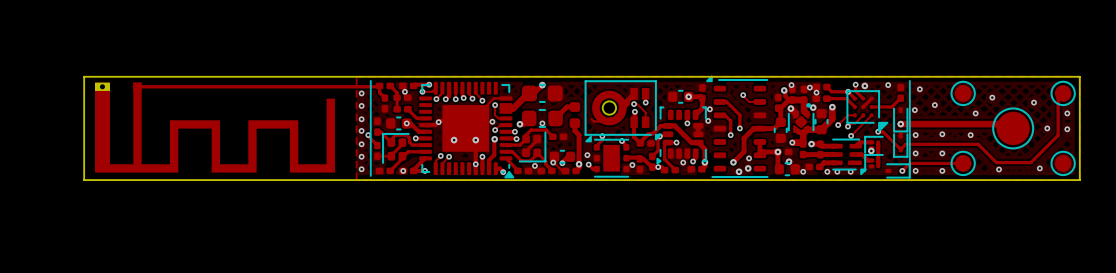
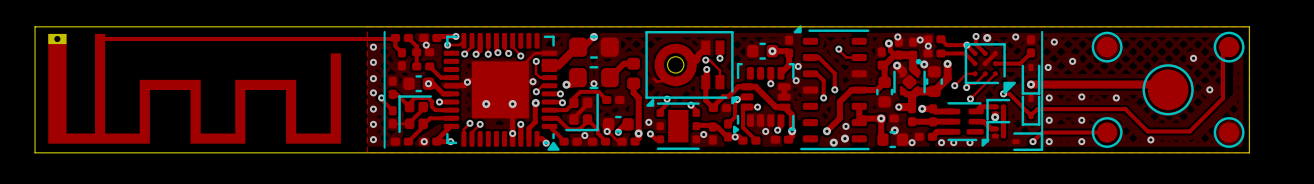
via: (992, 97) -> none
via: (975, 113) -> none
via: (1067, 113) -> none
via: (1067, 129) -> none
via: (1039, 168) -> none

